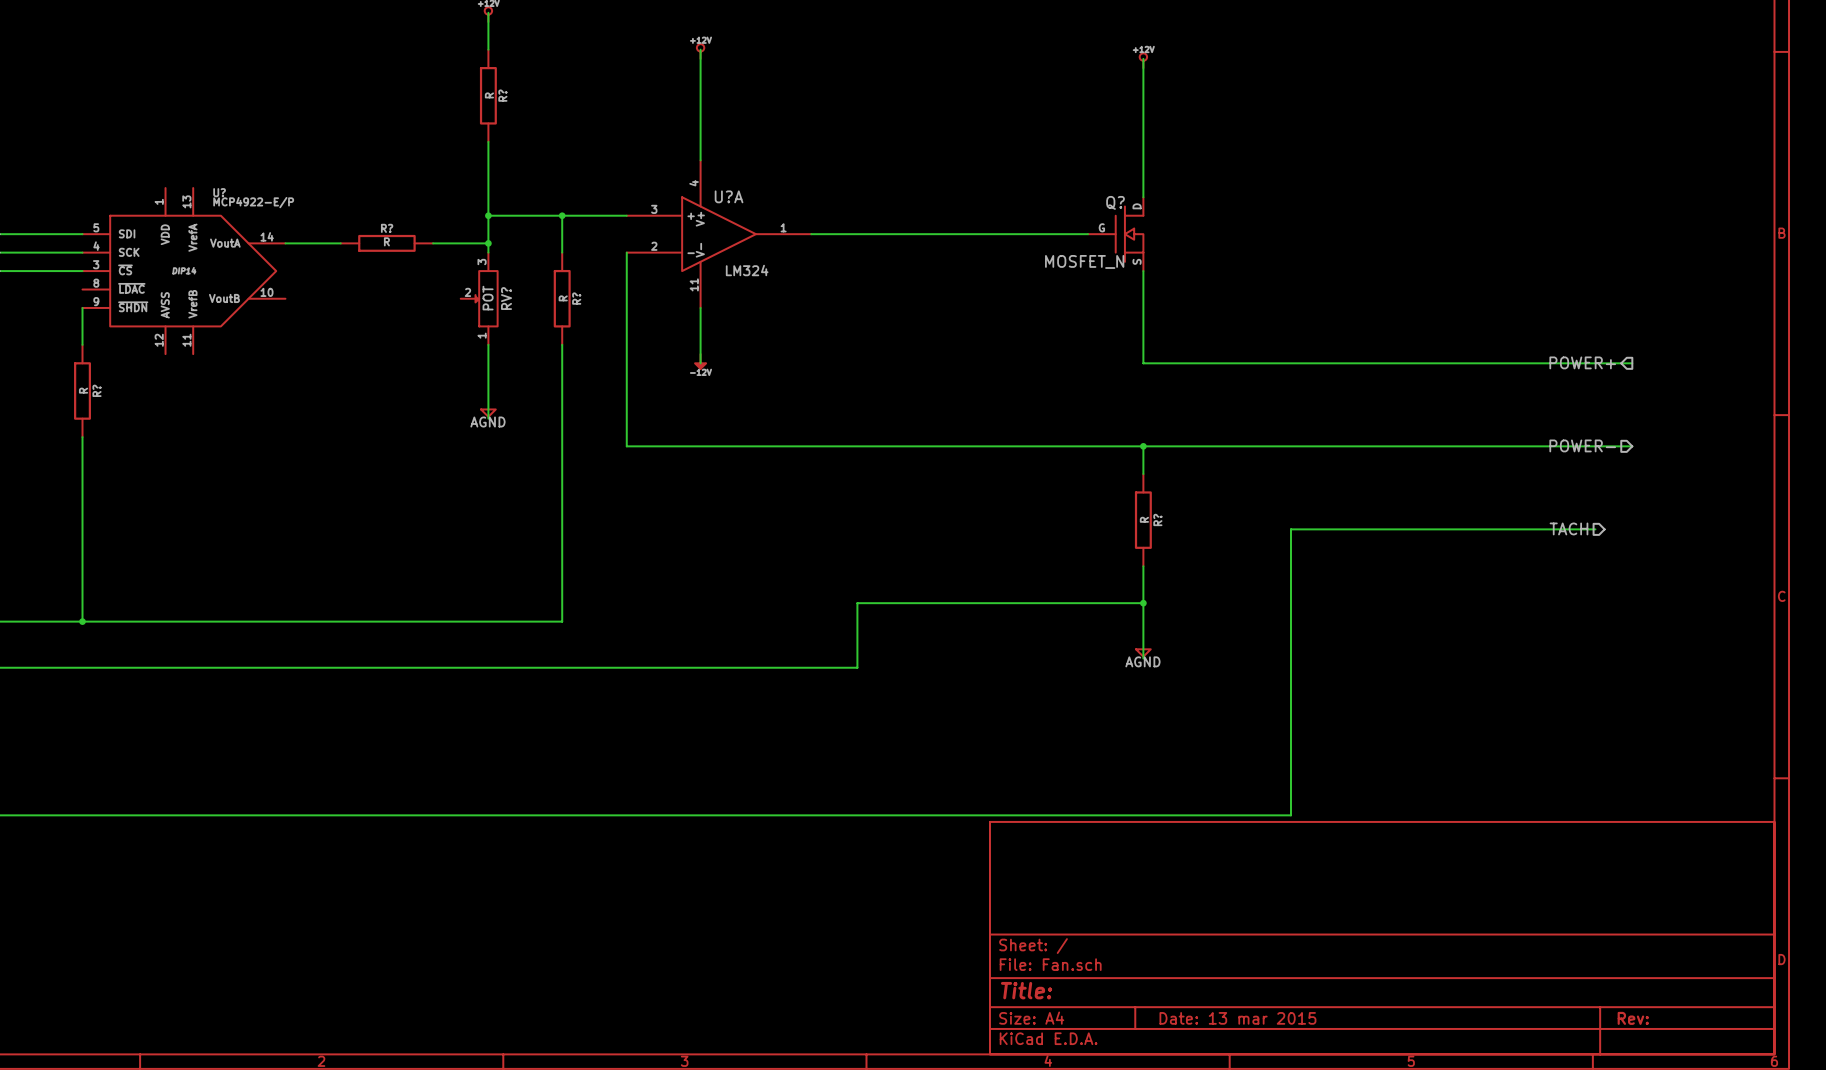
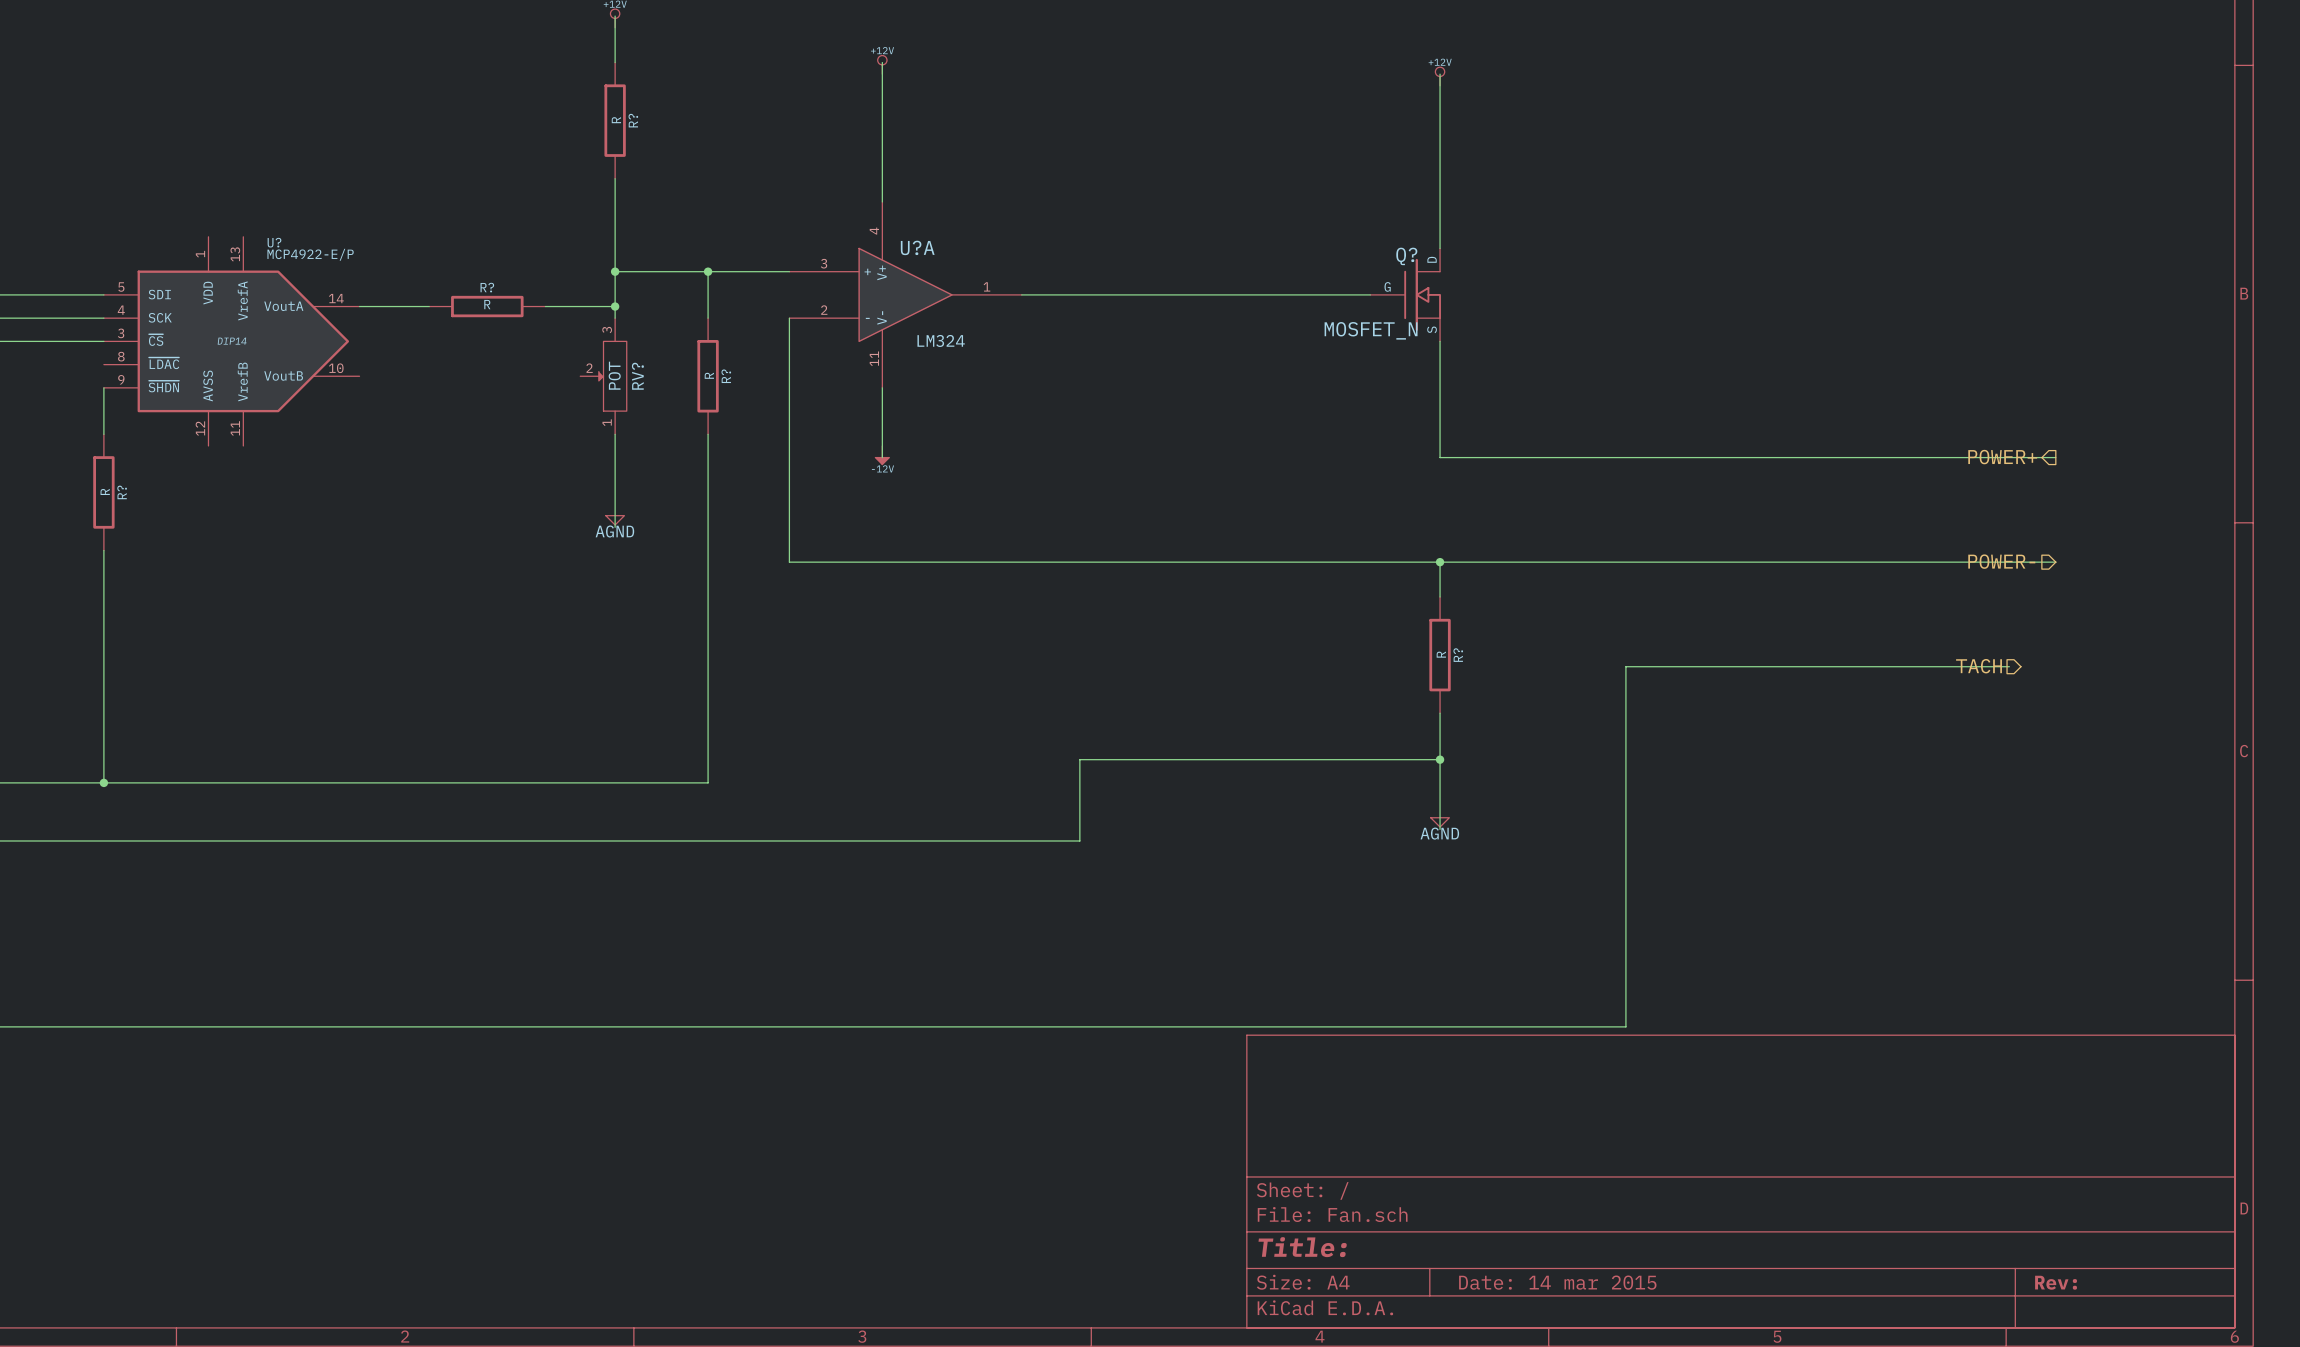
title block: Date: 13 mar 2015 (1237, 1018) -> Date: 14 mar 2015 (1557, 1282)

